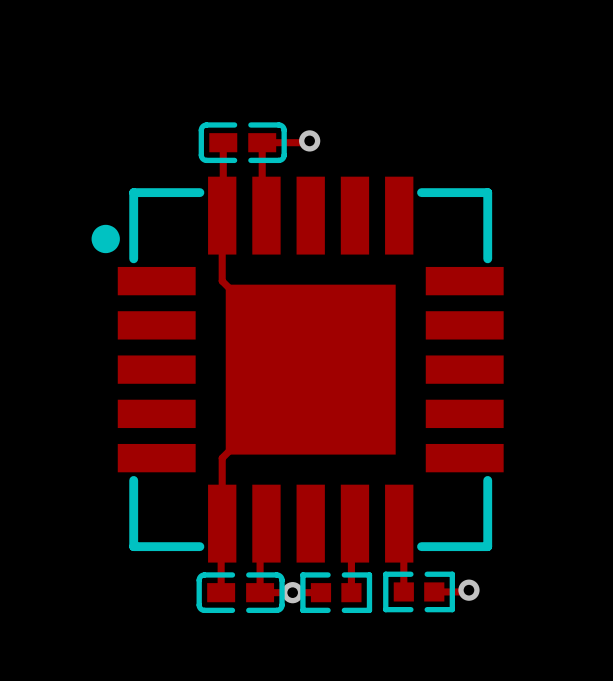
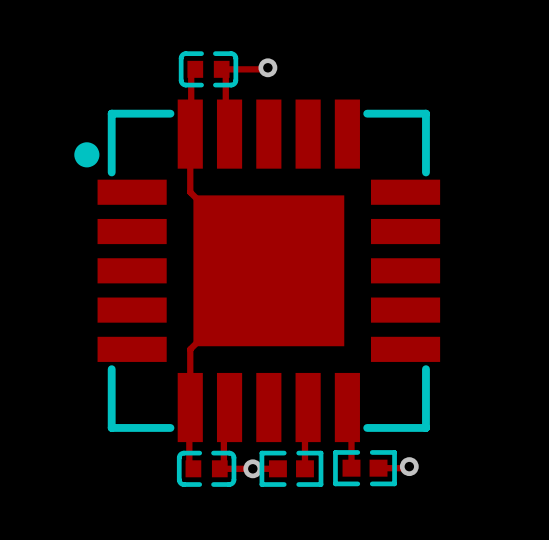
part footprint: [198, 122, 287, 164] -> [178, 51, 239, 88]
part footprint: [196, 572, 285, 614] -> [176, 450, 237, 487]

